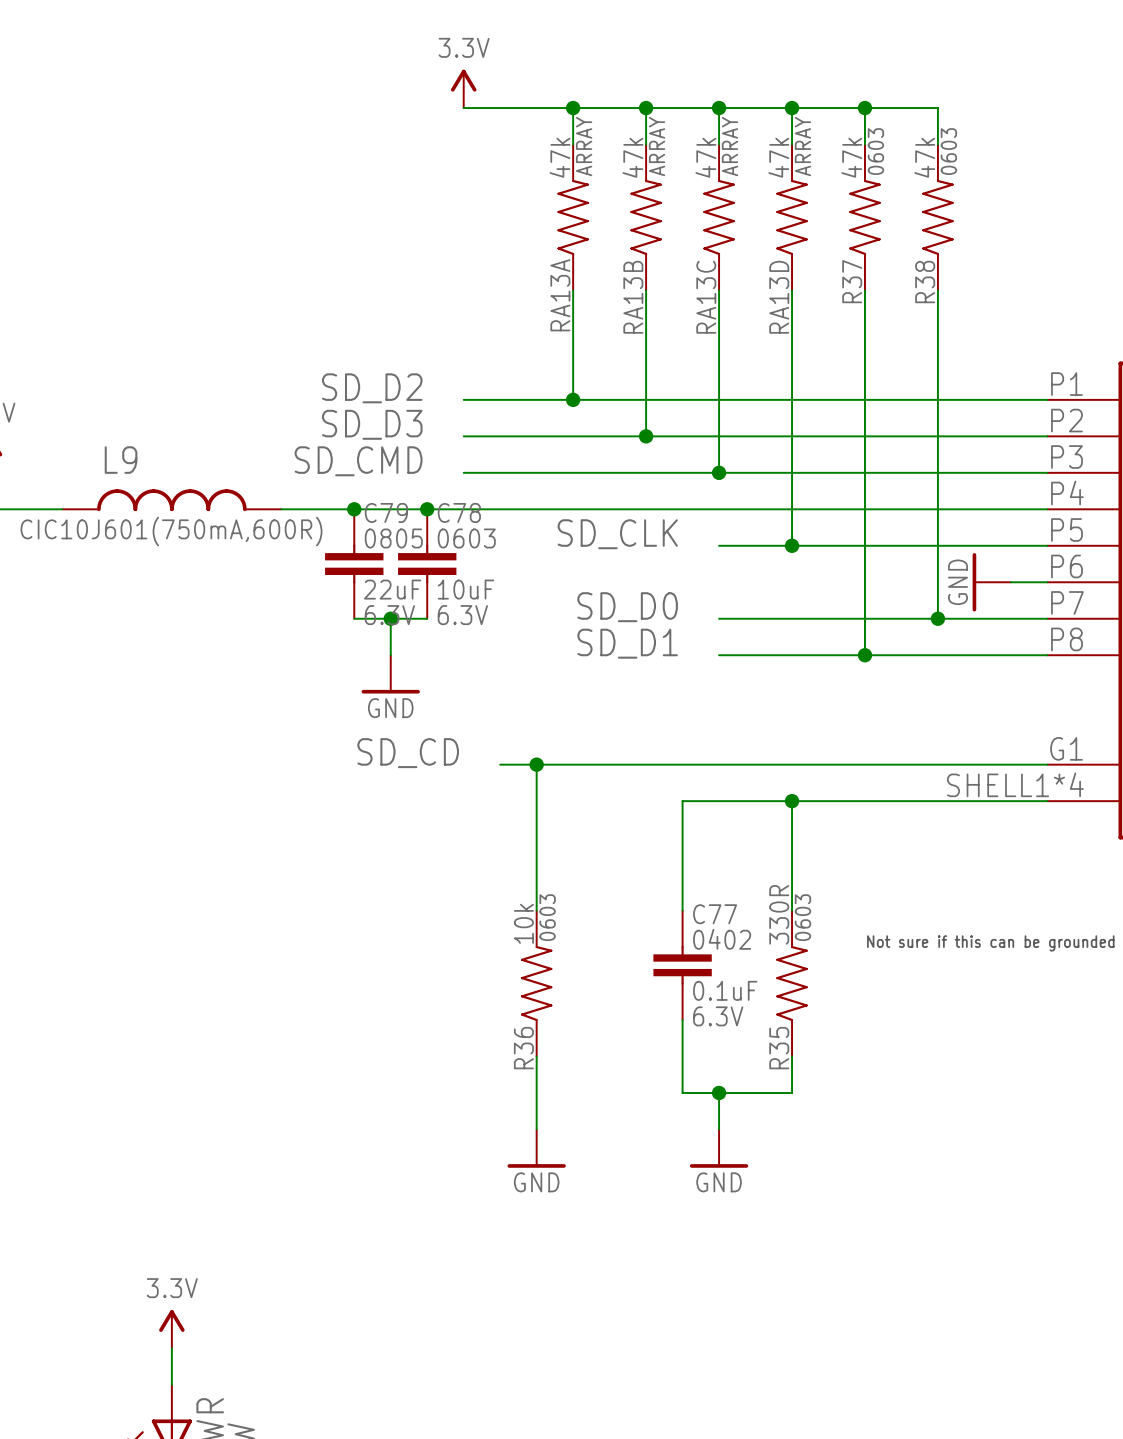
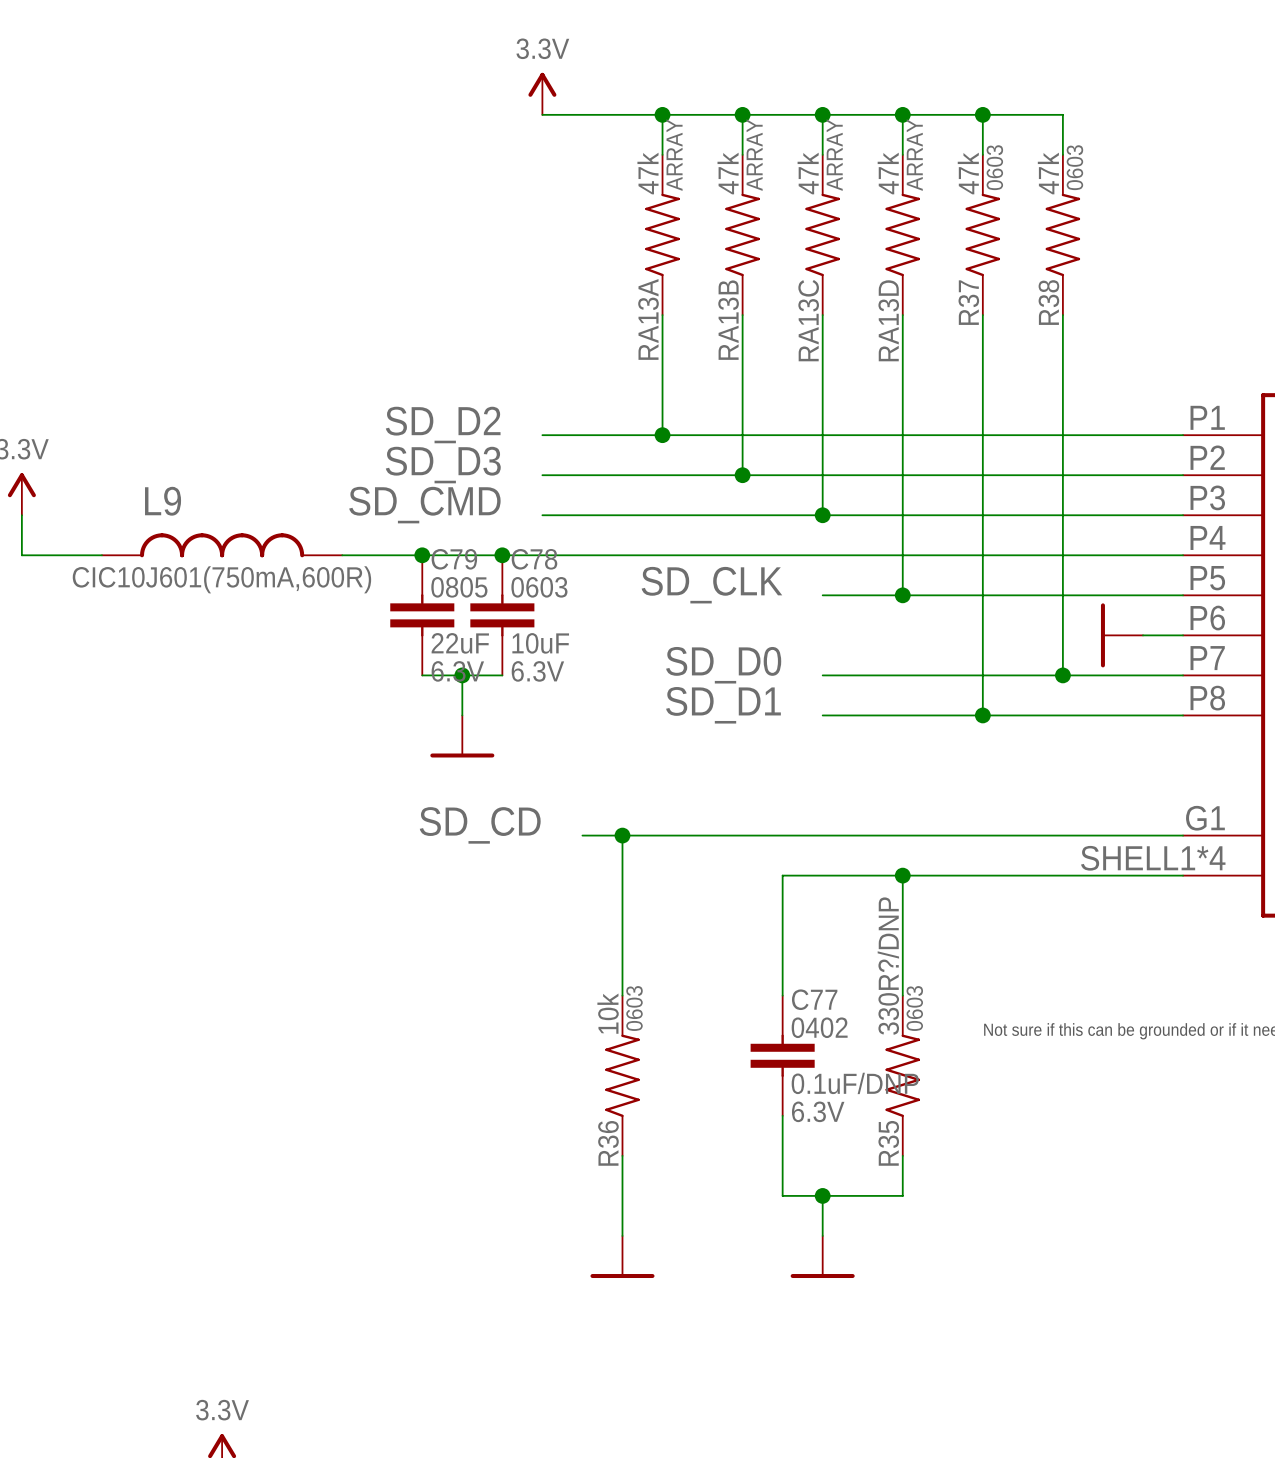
power symbol text: GND (958, 582) -> none
power symbol text: GND (390, 708) -> none
R35 value: 330R (779, 914) -> 330R?/DNP (888, 966)
C77 value: 0.1uF (725, 990) -> 0.1uF/DNP (855, 1083)
power symbol text: GND (536, 1182) -> none
power symbol text: GND (719, 1182) -> none

